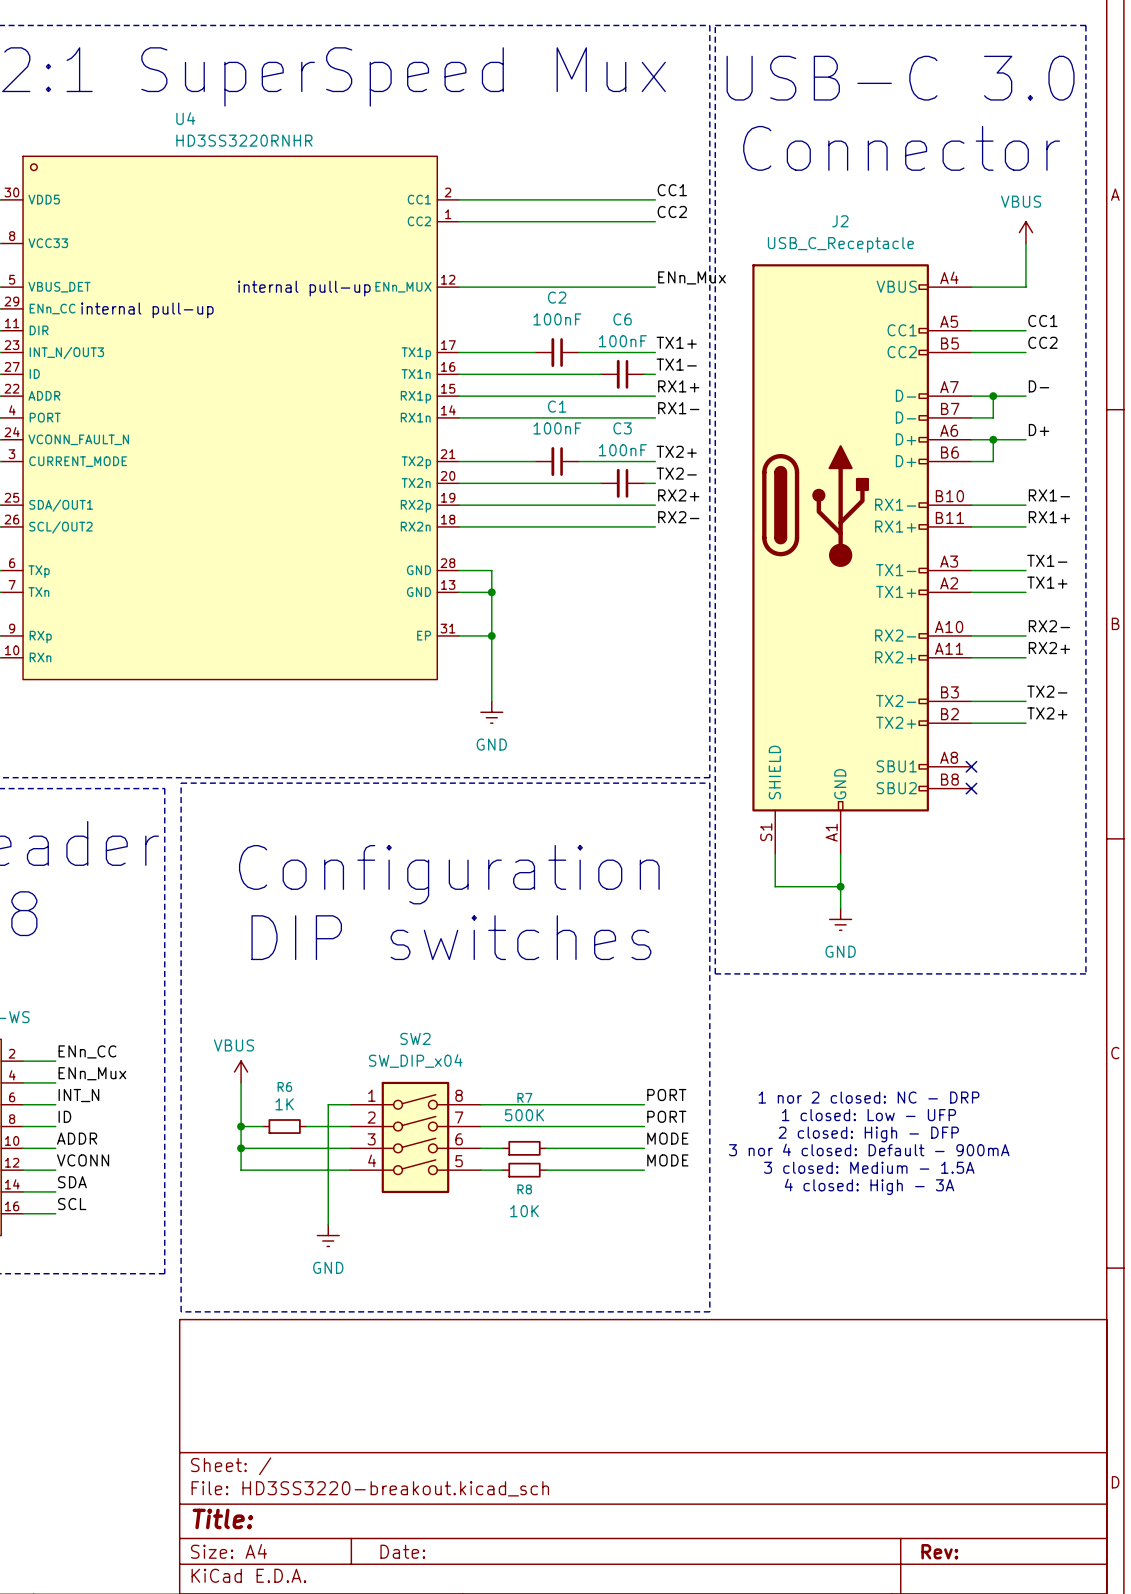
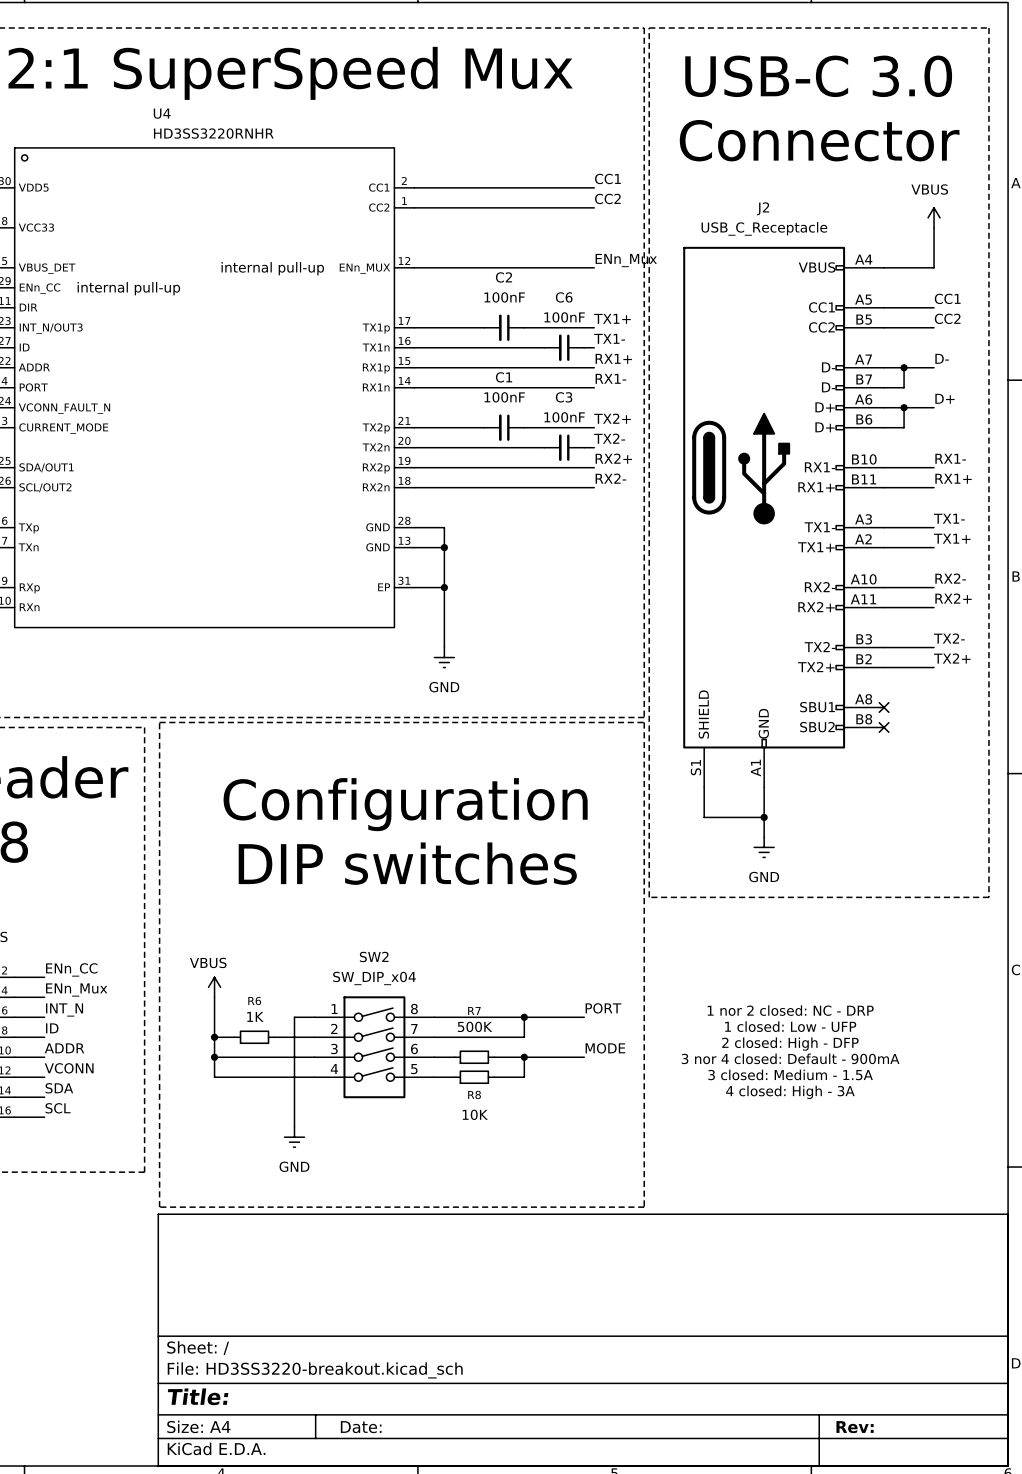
junction: none -> (524, 1017)
label: PORT (666, 1116) -> none
wire: (579, 1126) (644, 1126) -> (524, 1037) (524, 1017)
junction: none -> (524, 1057)
label: MODE (667, 1160) -> none
wire: (579, 1170) (644, 1170) -> (524, 1077) (524, 1057)

